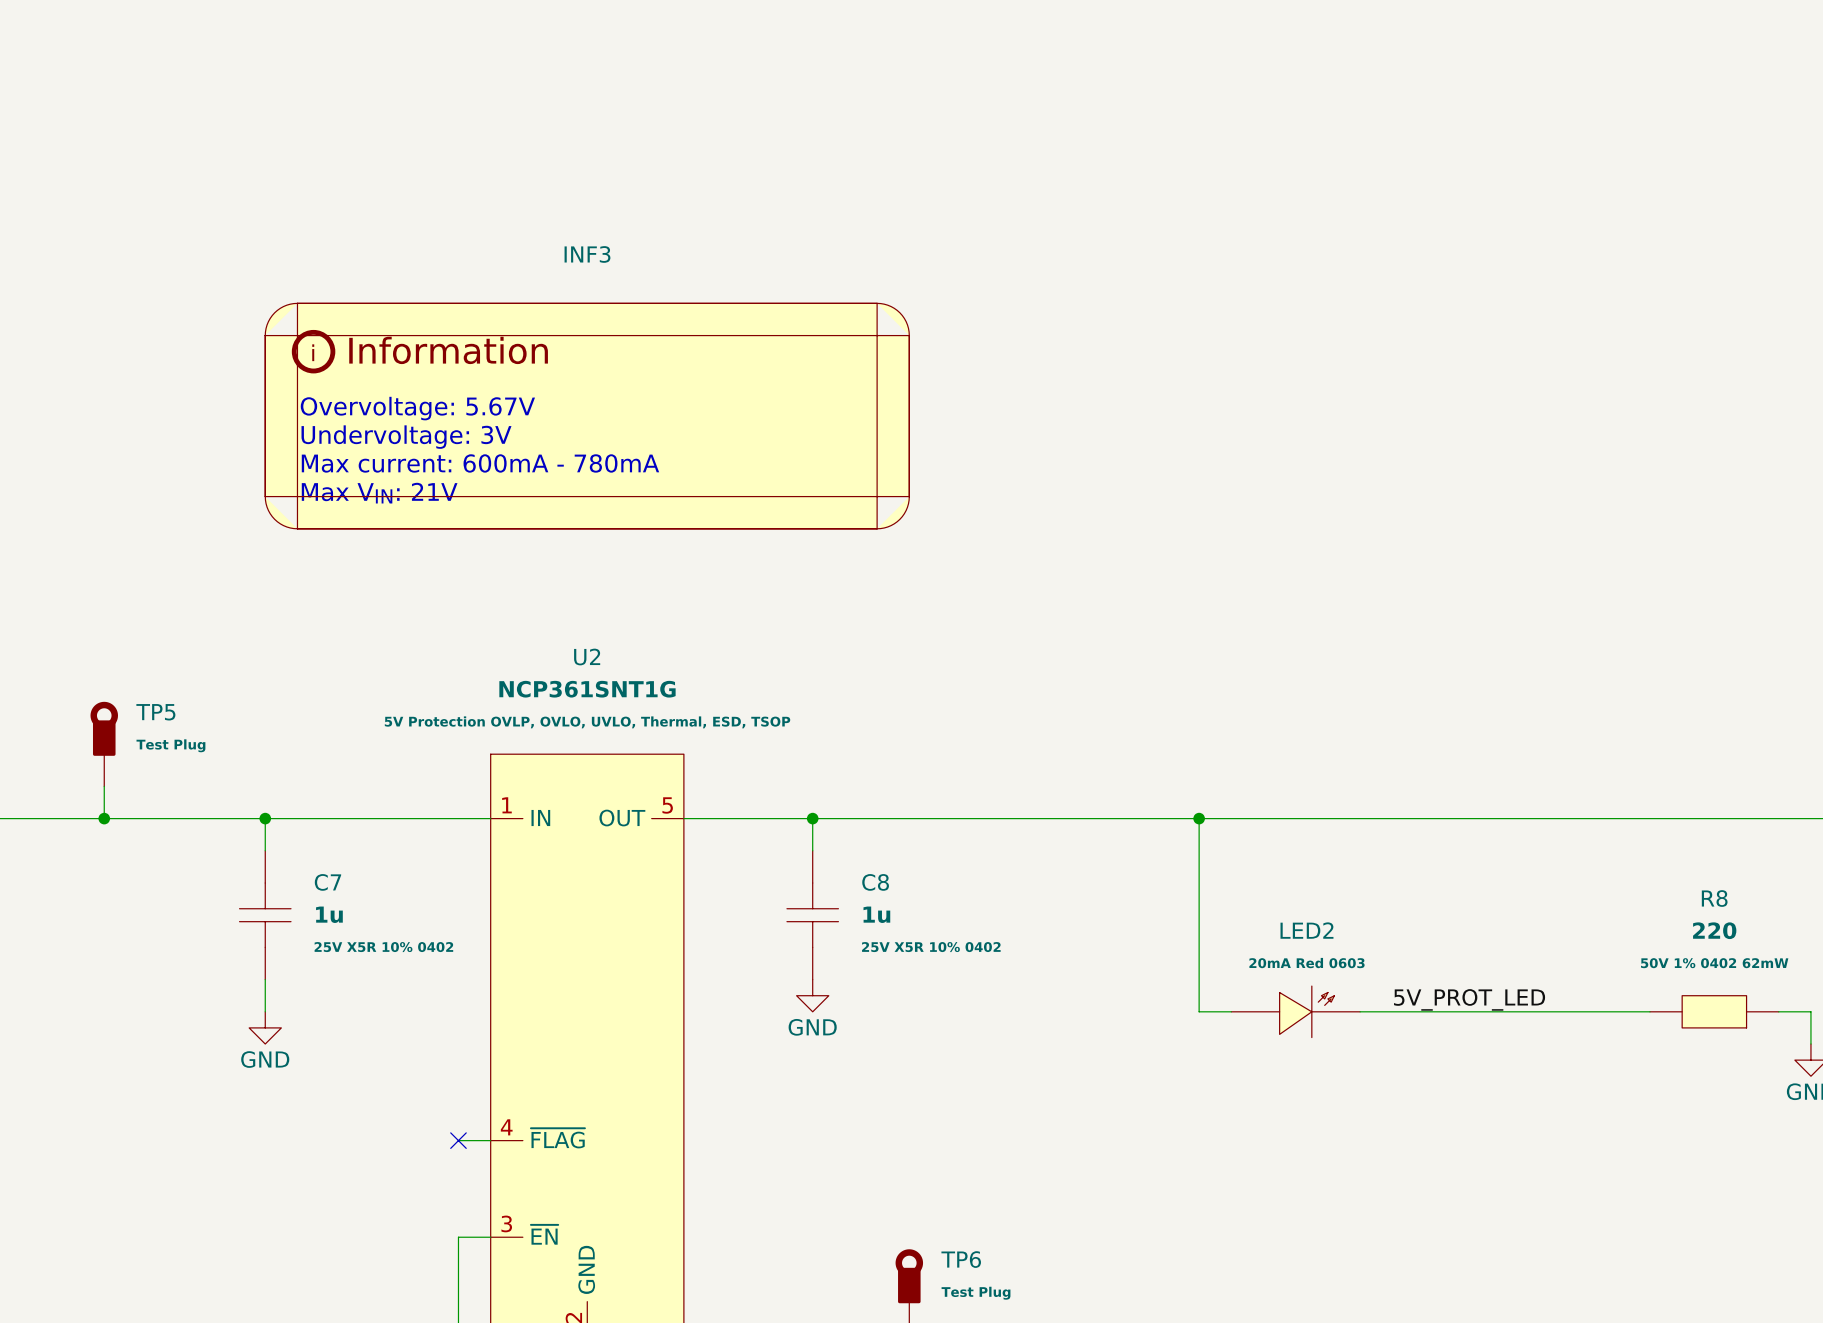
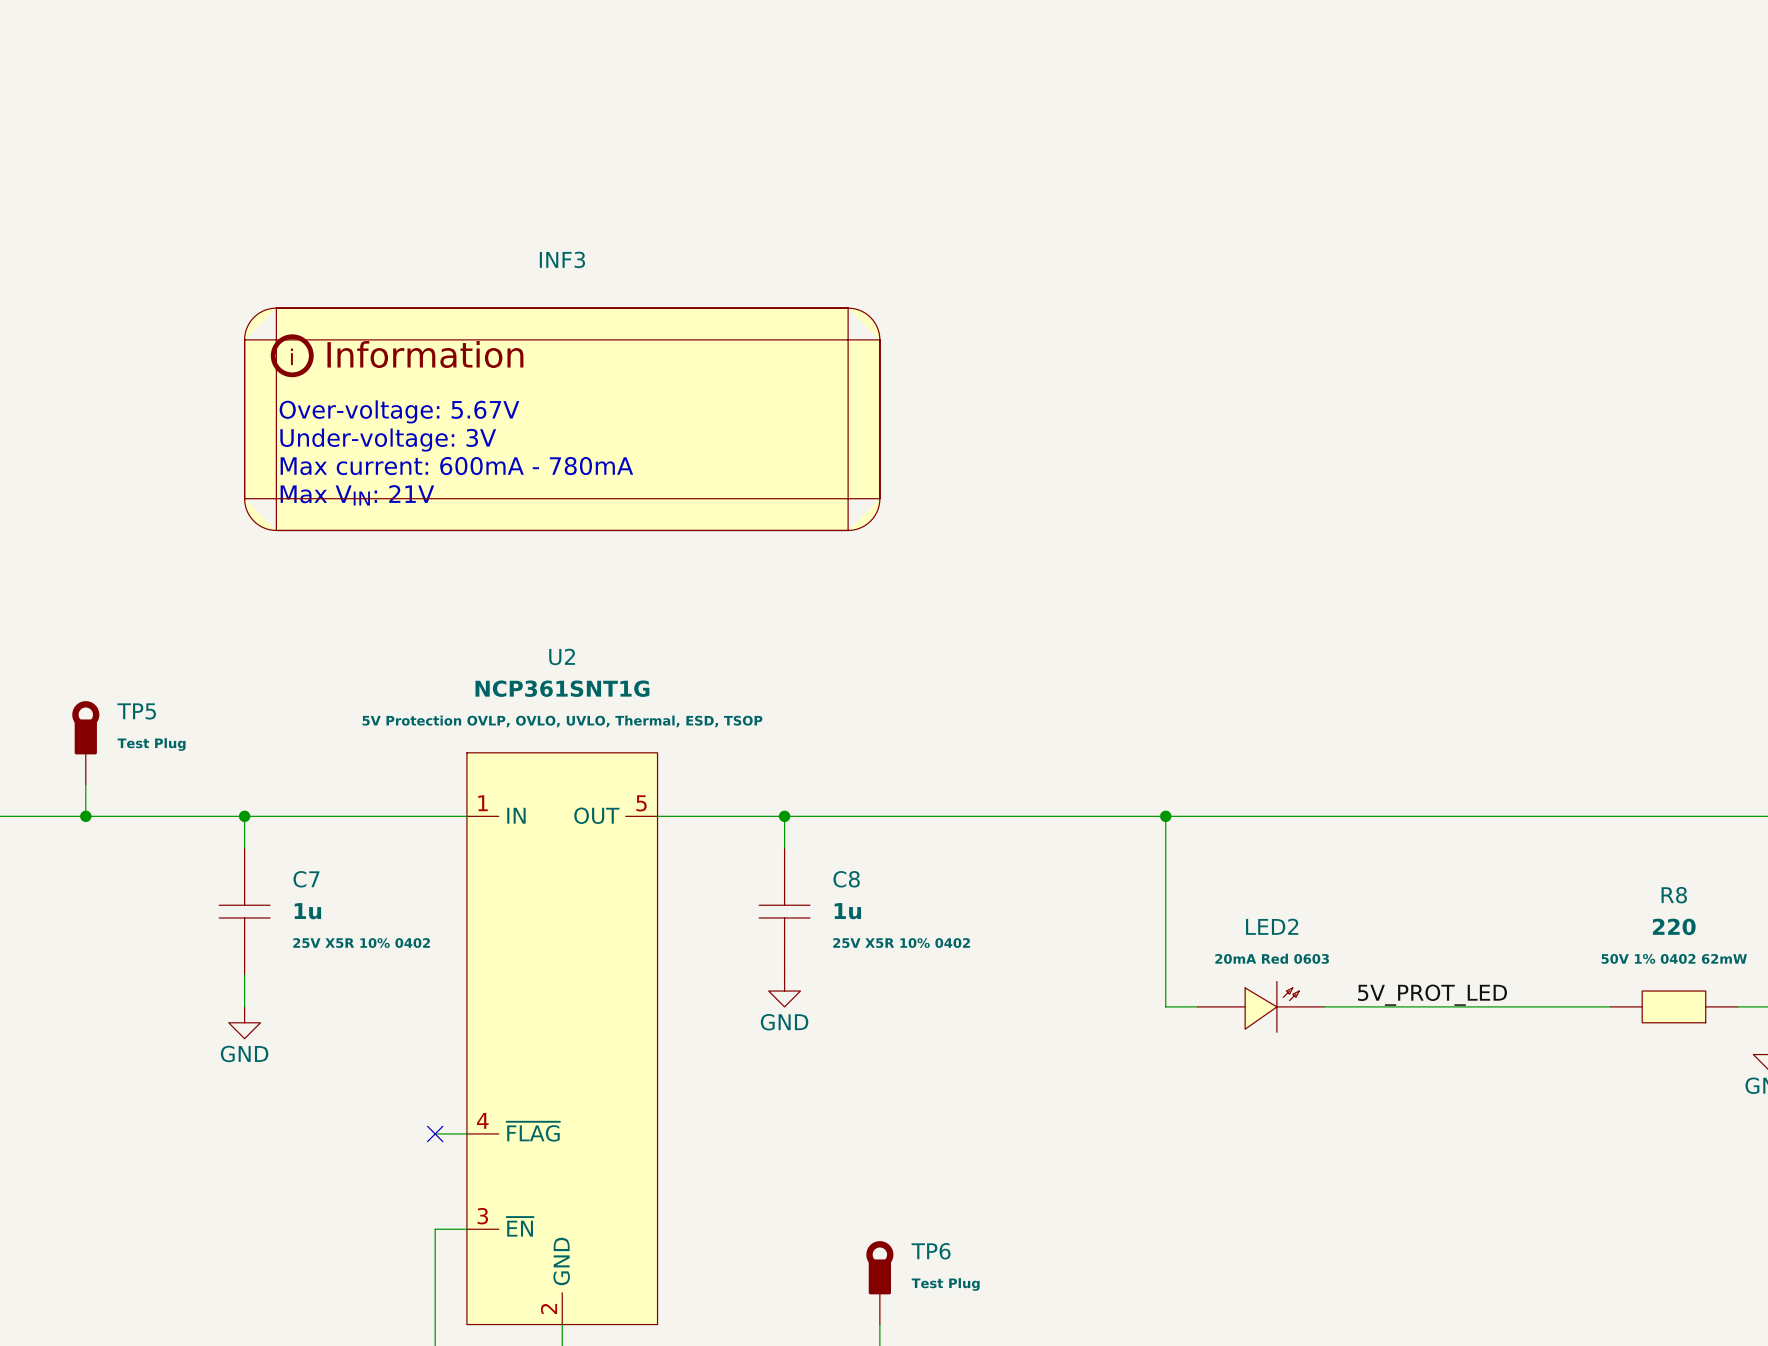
text: Overvoltage: 5.67V (417, 408) -> Over-voltage: 5.67V (399, 411)
text: Undervoltage: 3V (406, 437) -> Under-voltage: 3V (388, 440)

